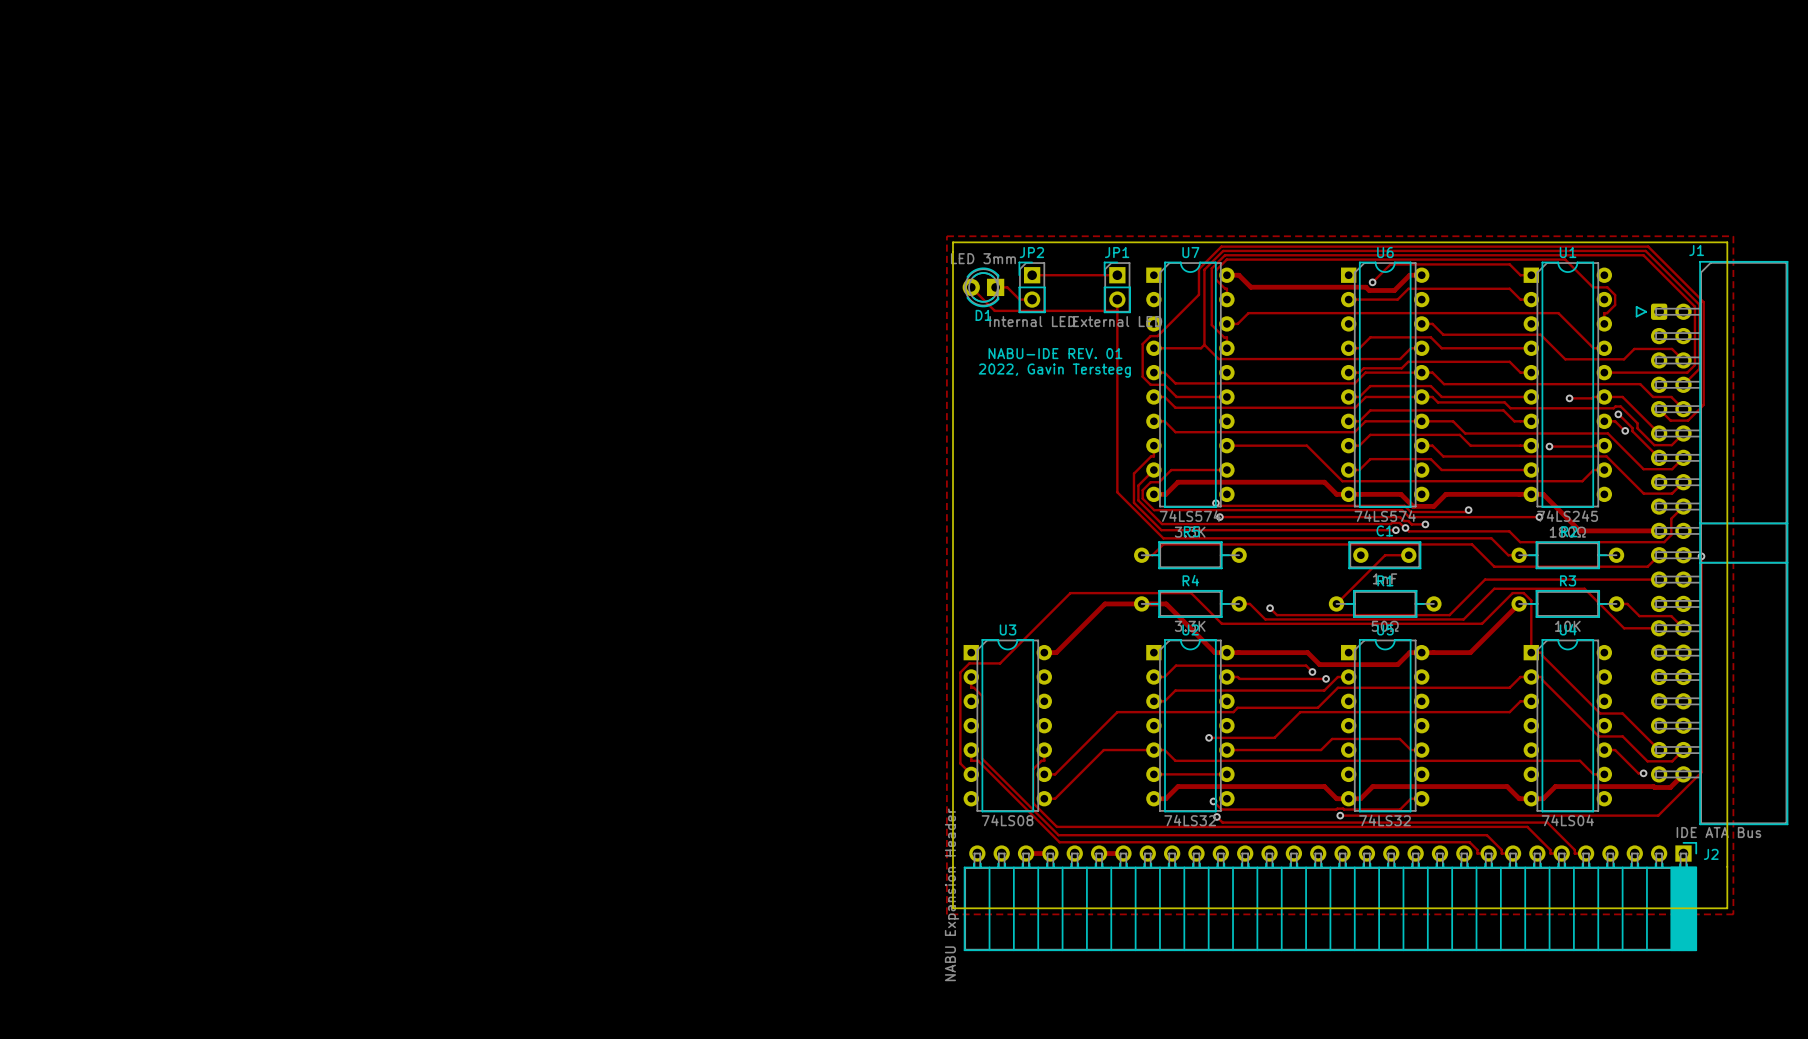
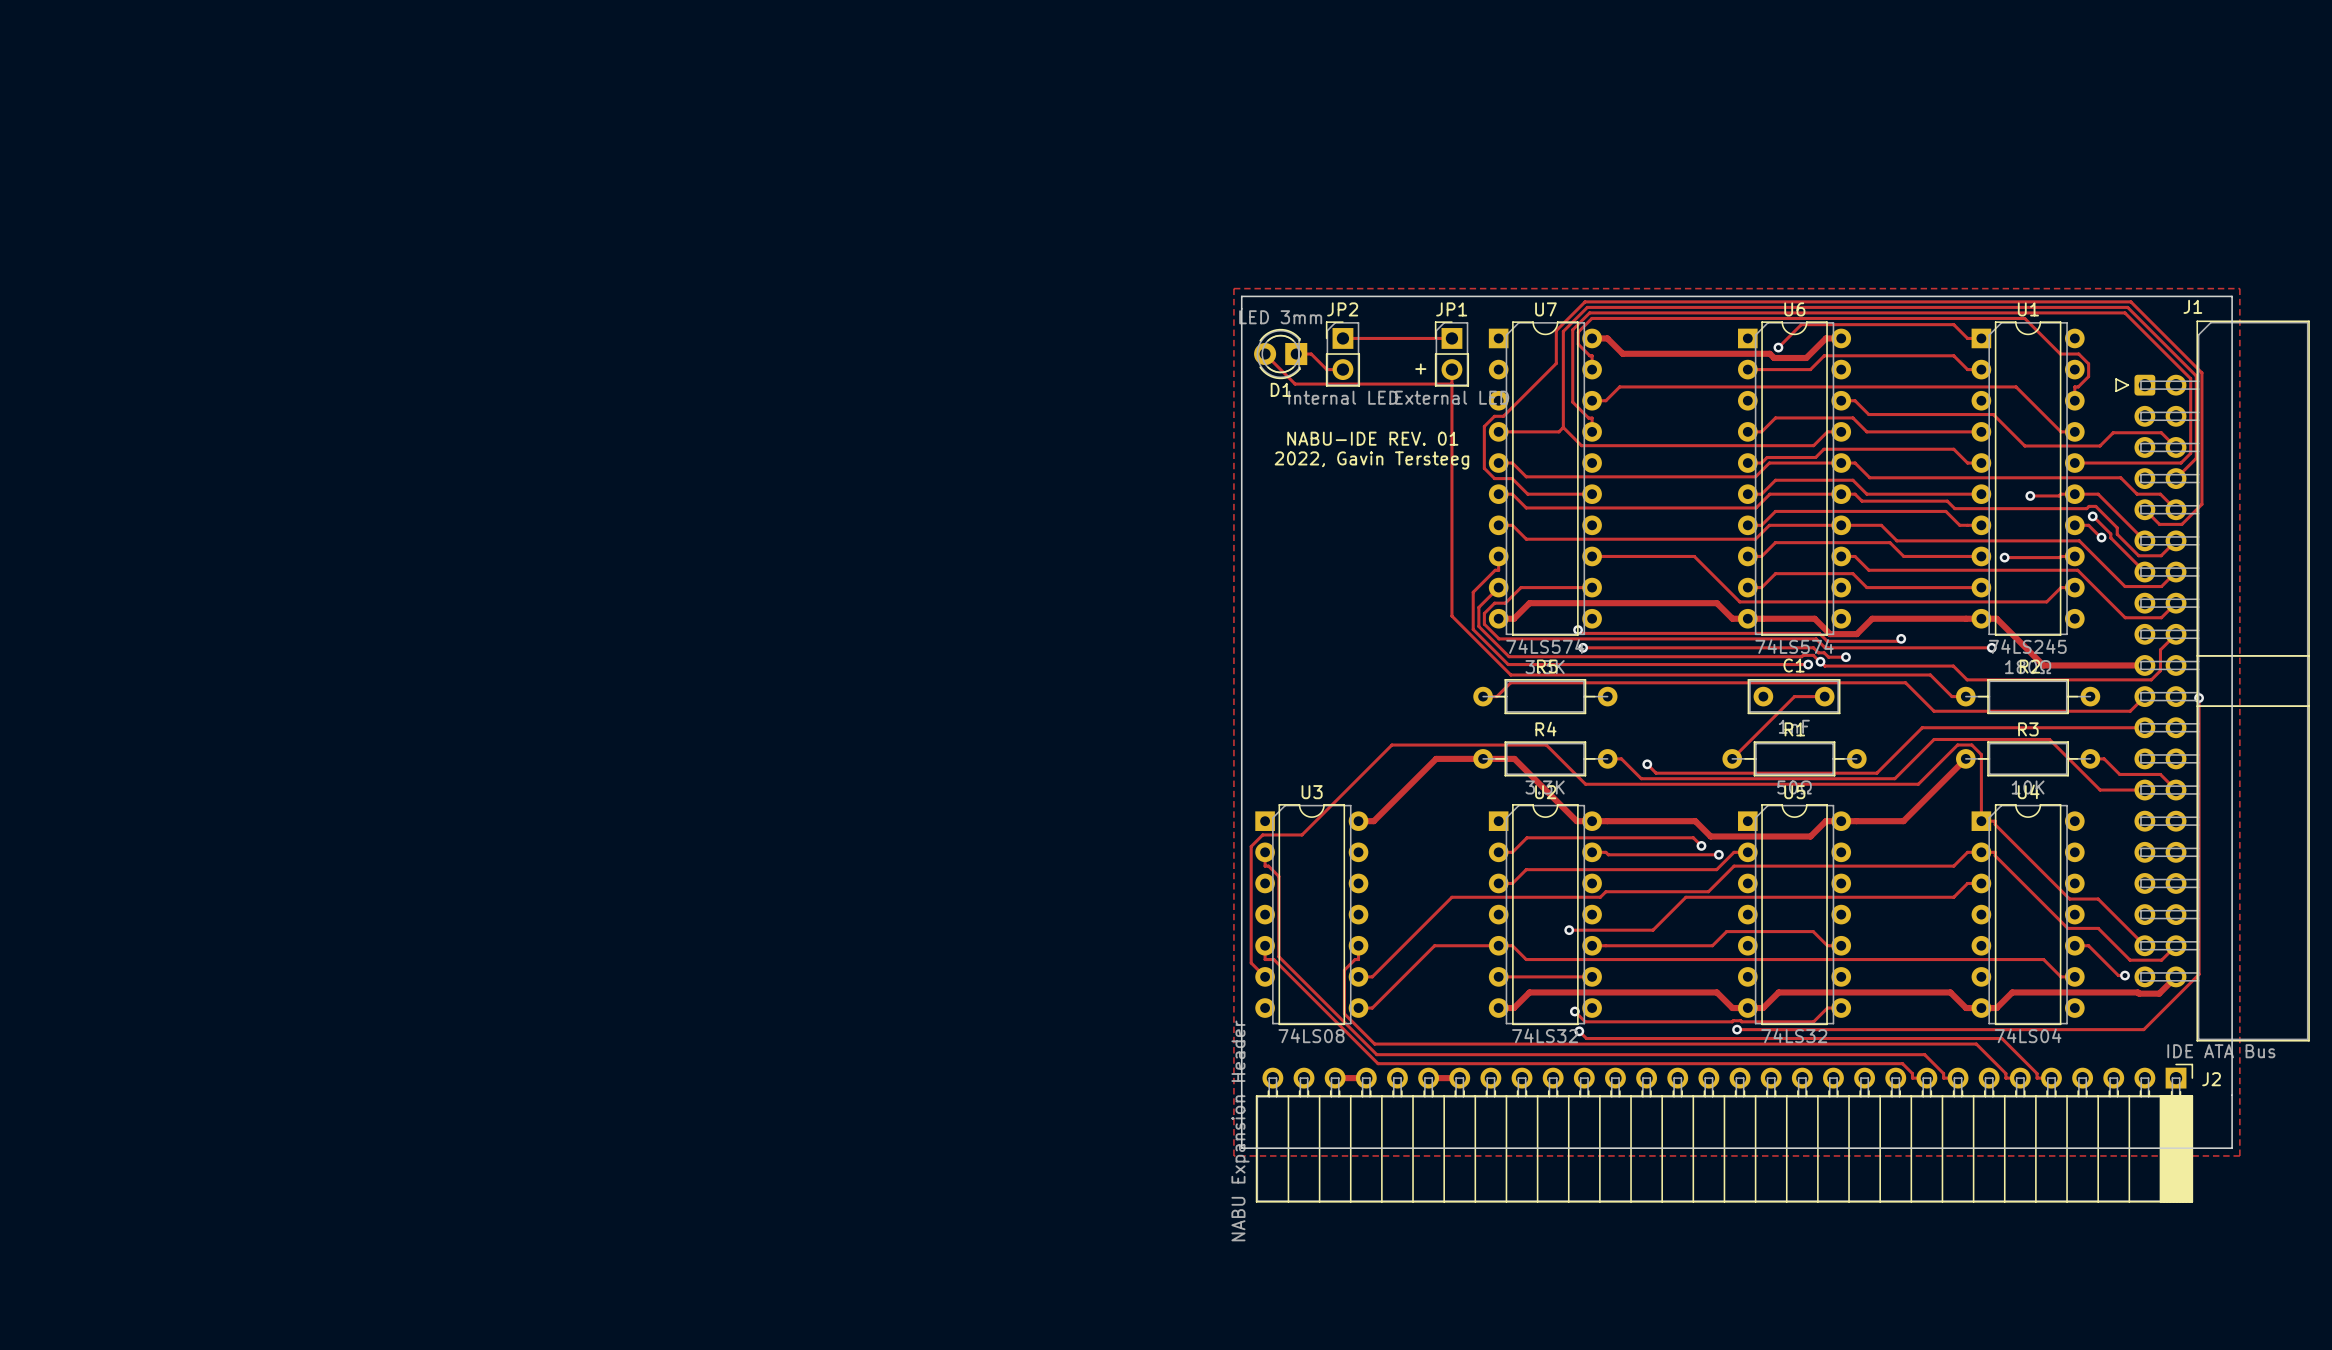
text: none -> + (1420, 369)

